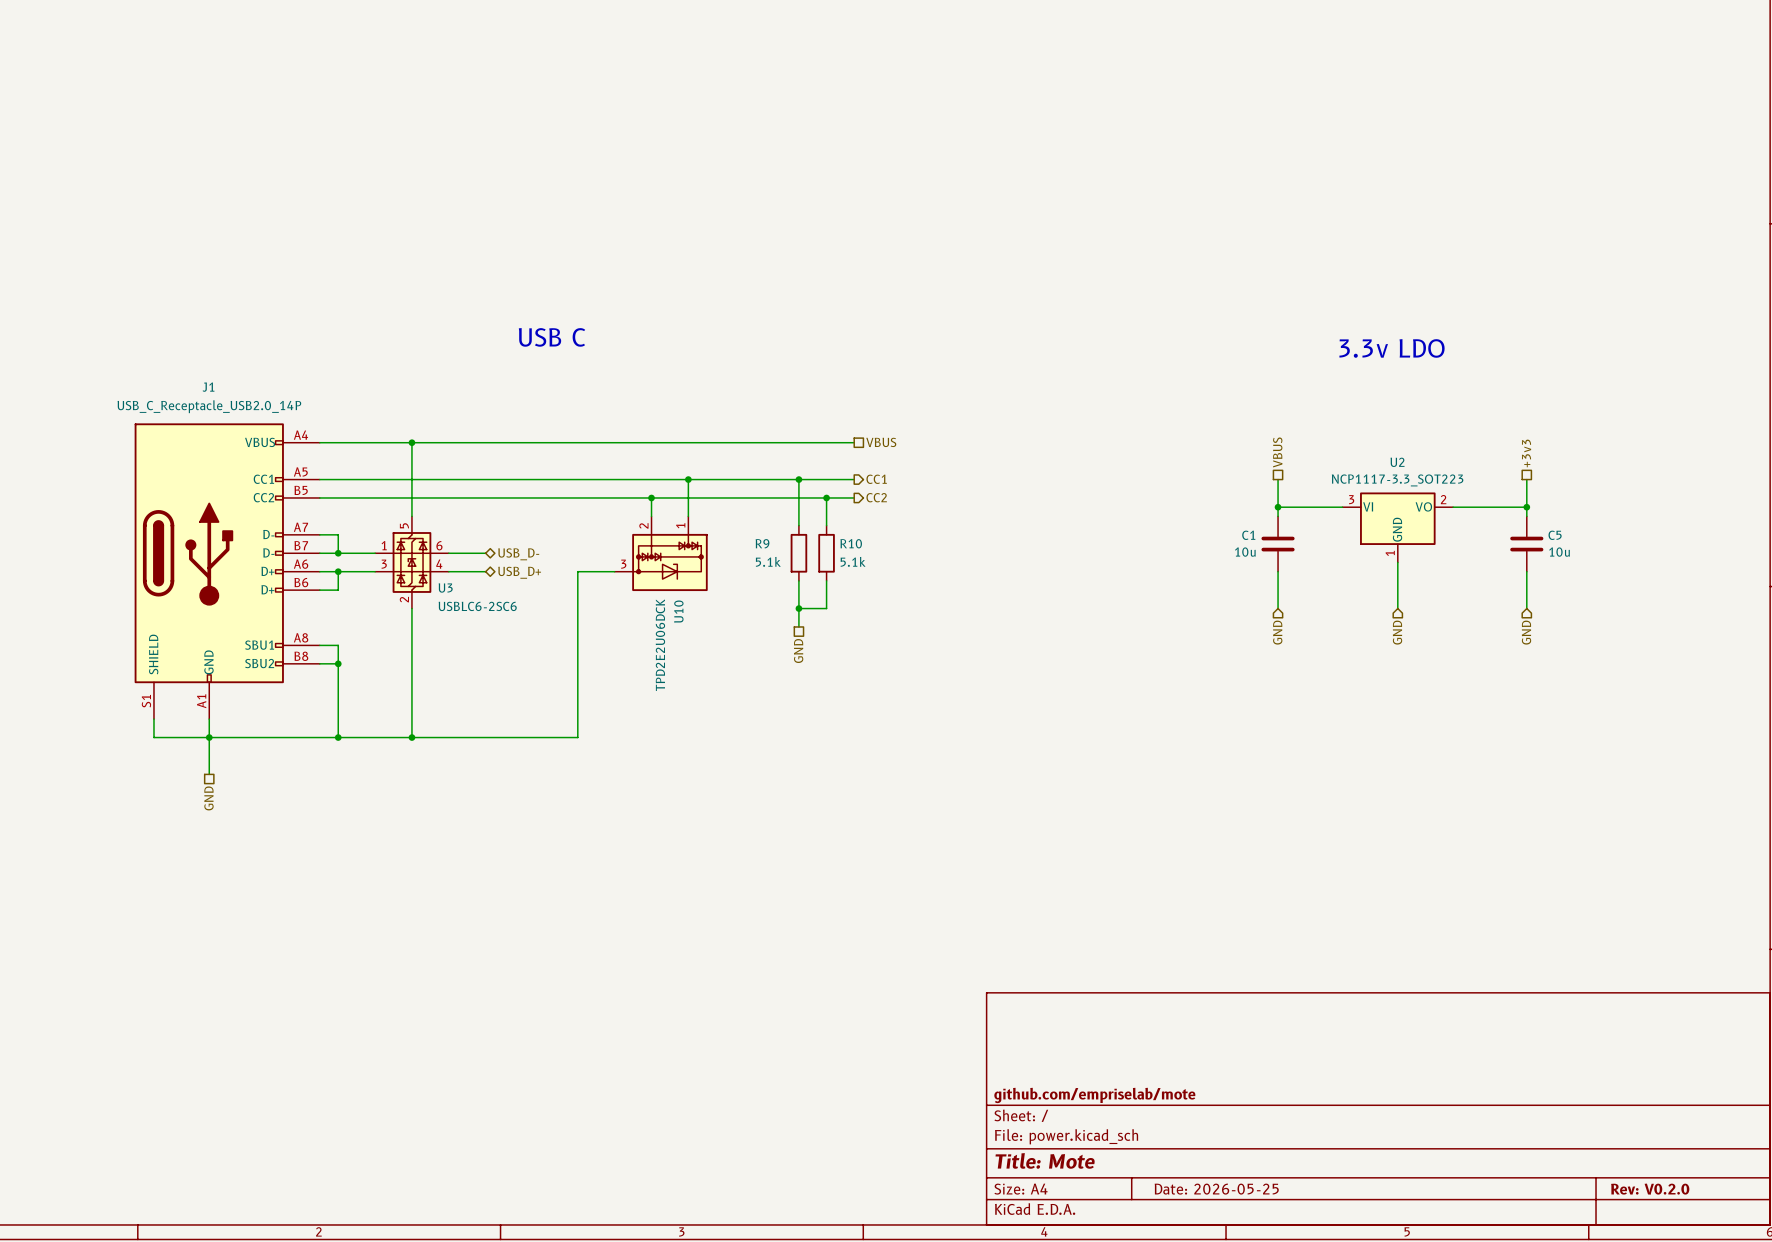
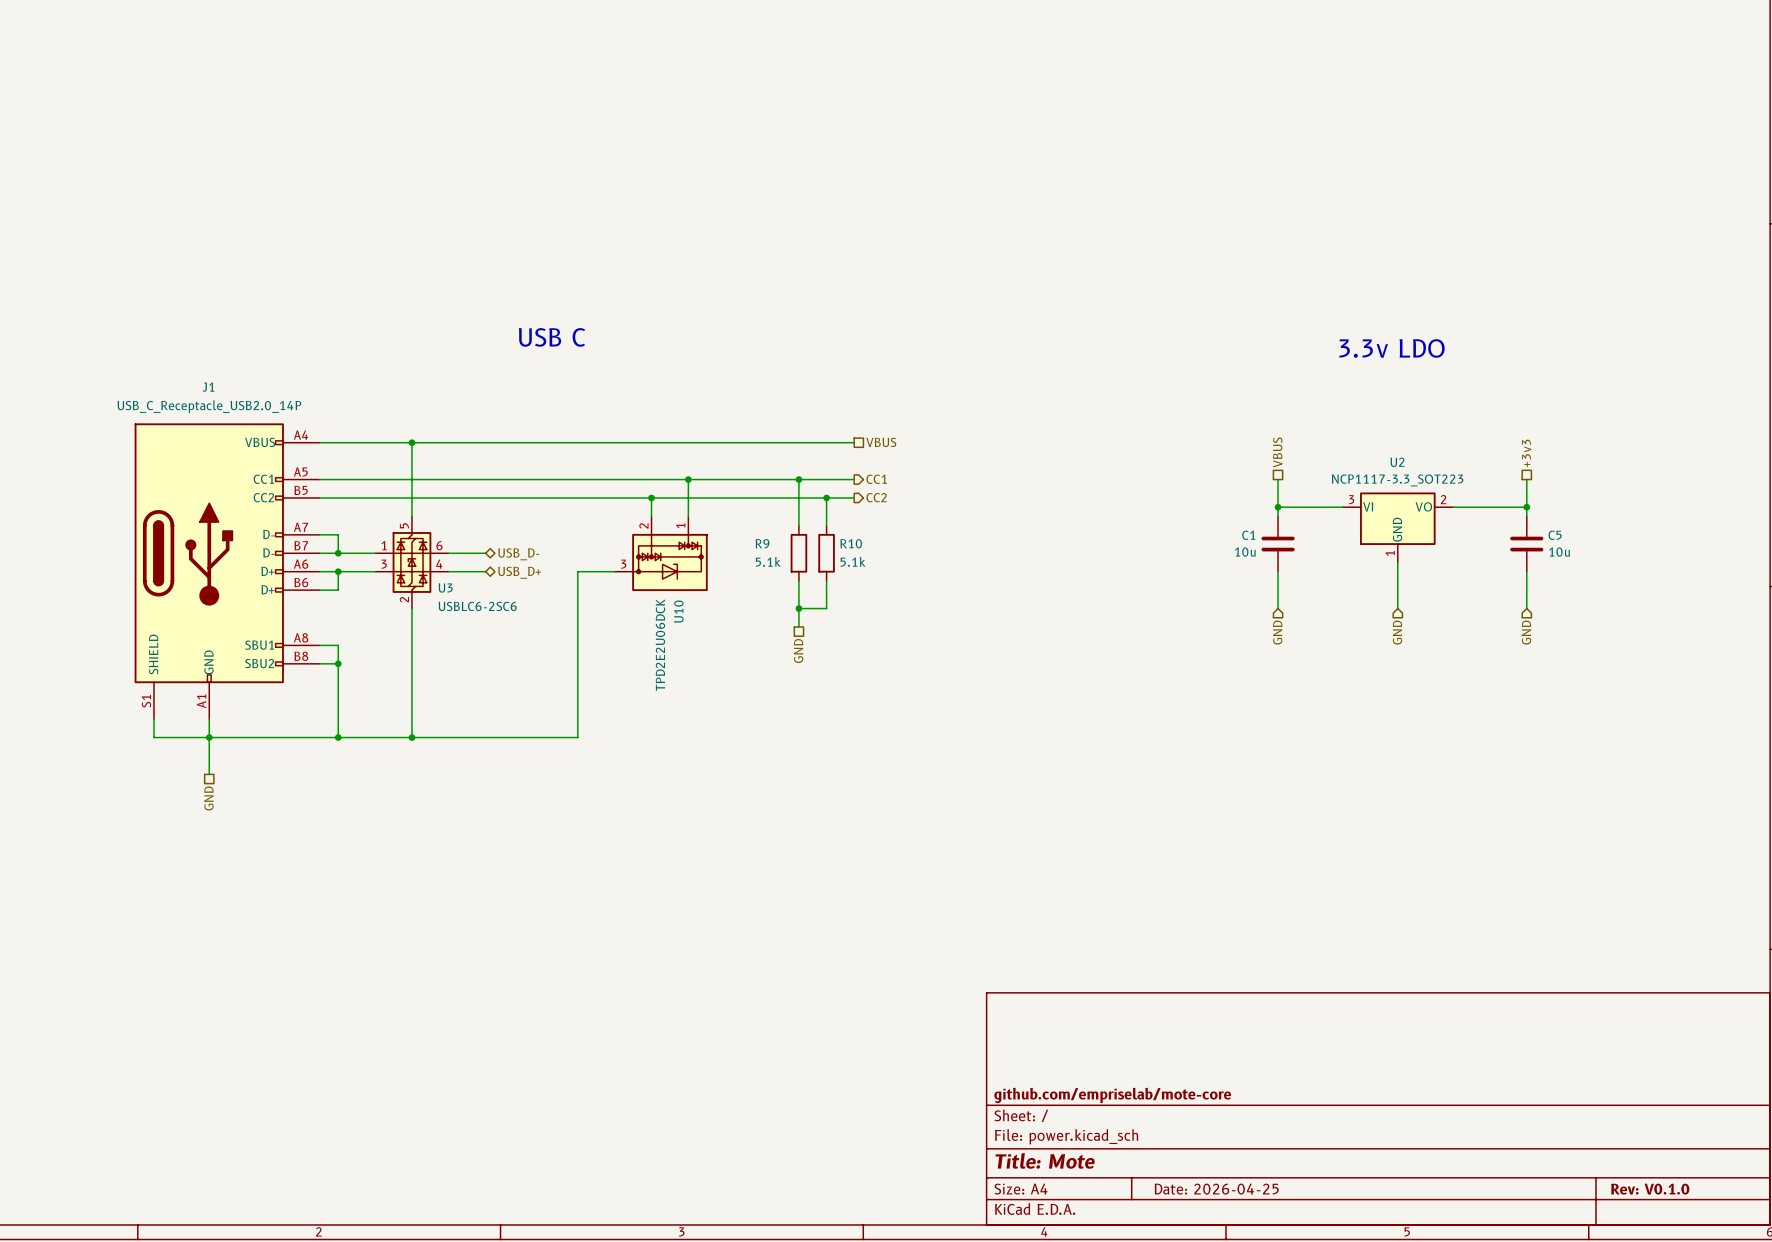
title block: github.com/empriselab/mote (1094, 1095) -> github.com/empriselab/mote-core (1112, 1095)
title block: Date: 2026-05-25 (1216, 1189) -> Date: 2026-04-25 (1216, 1189)
title block: Rev: V0.2.0 (1650, 1189) -> Rev: V0.1.0 (1650, 1189)

